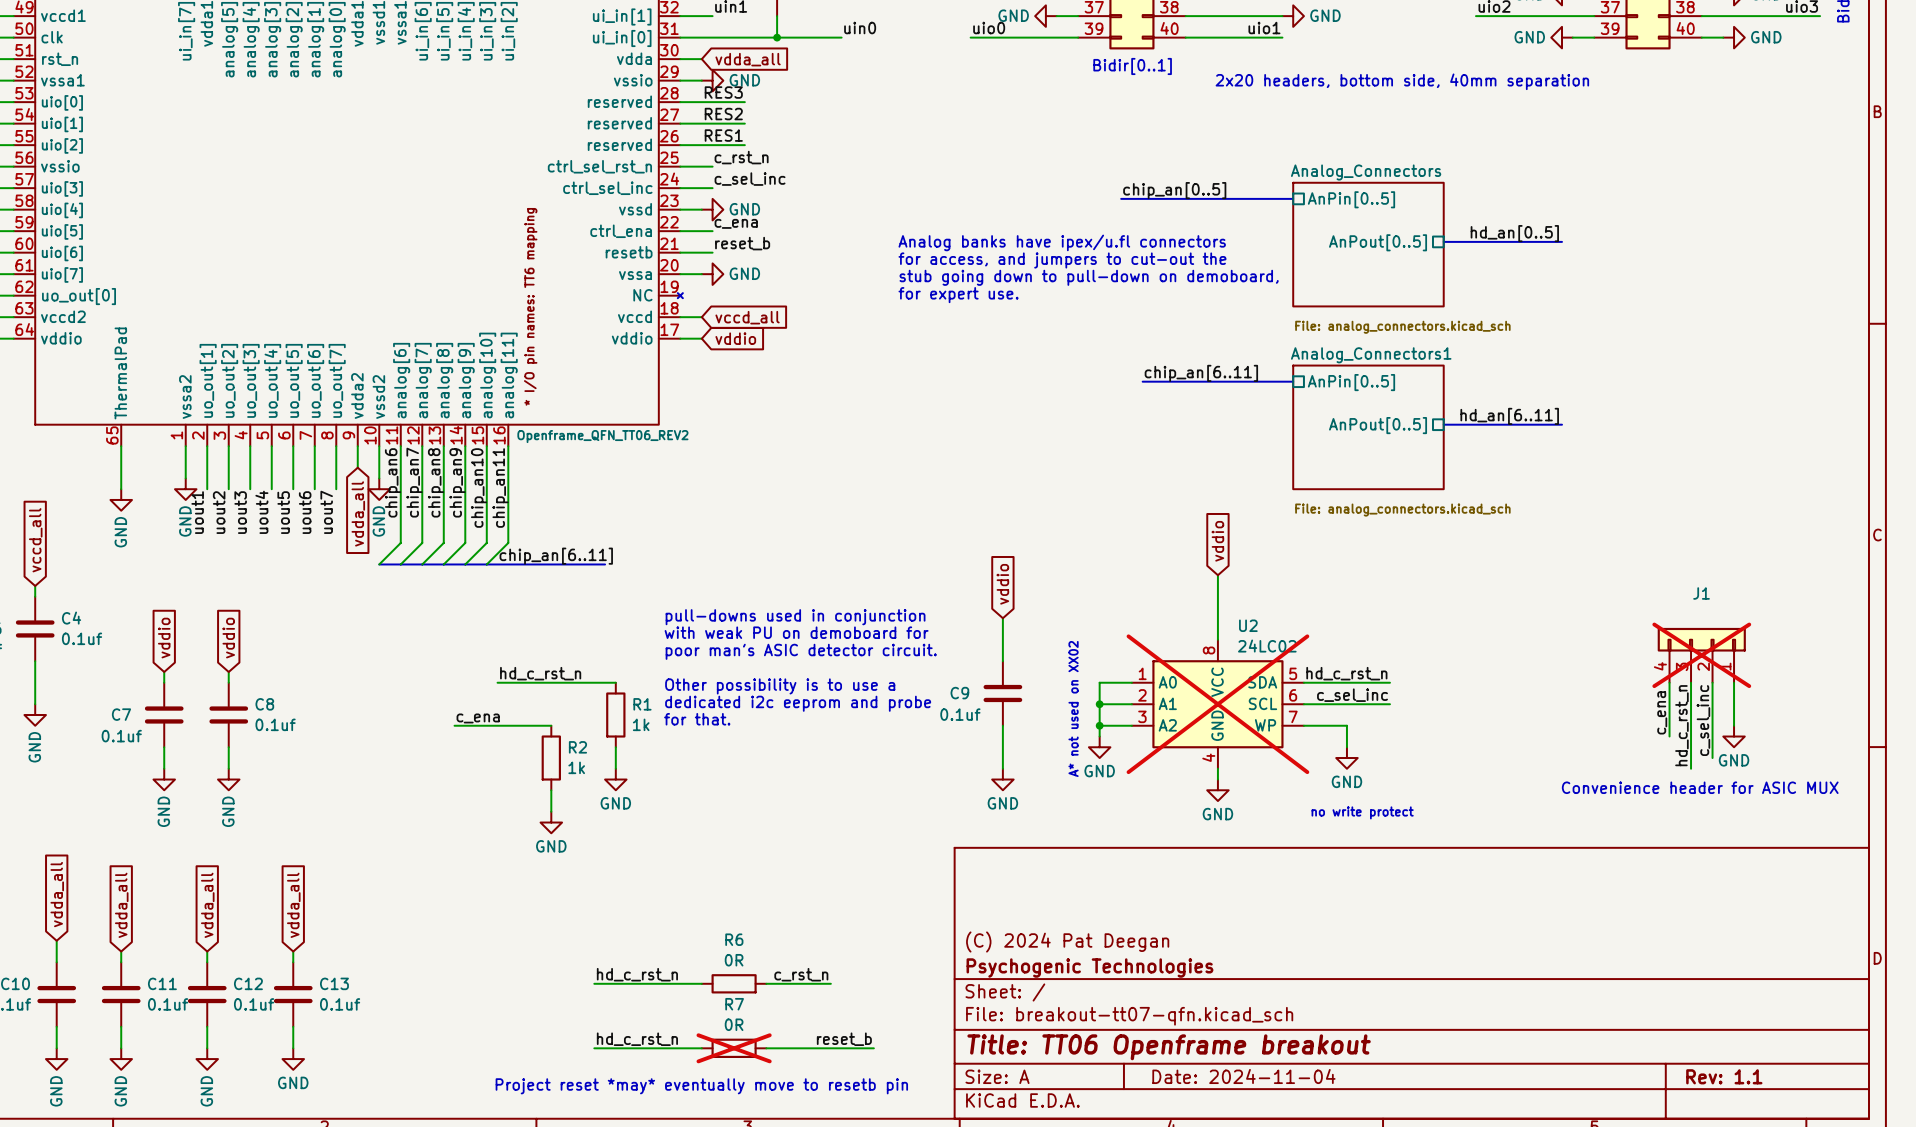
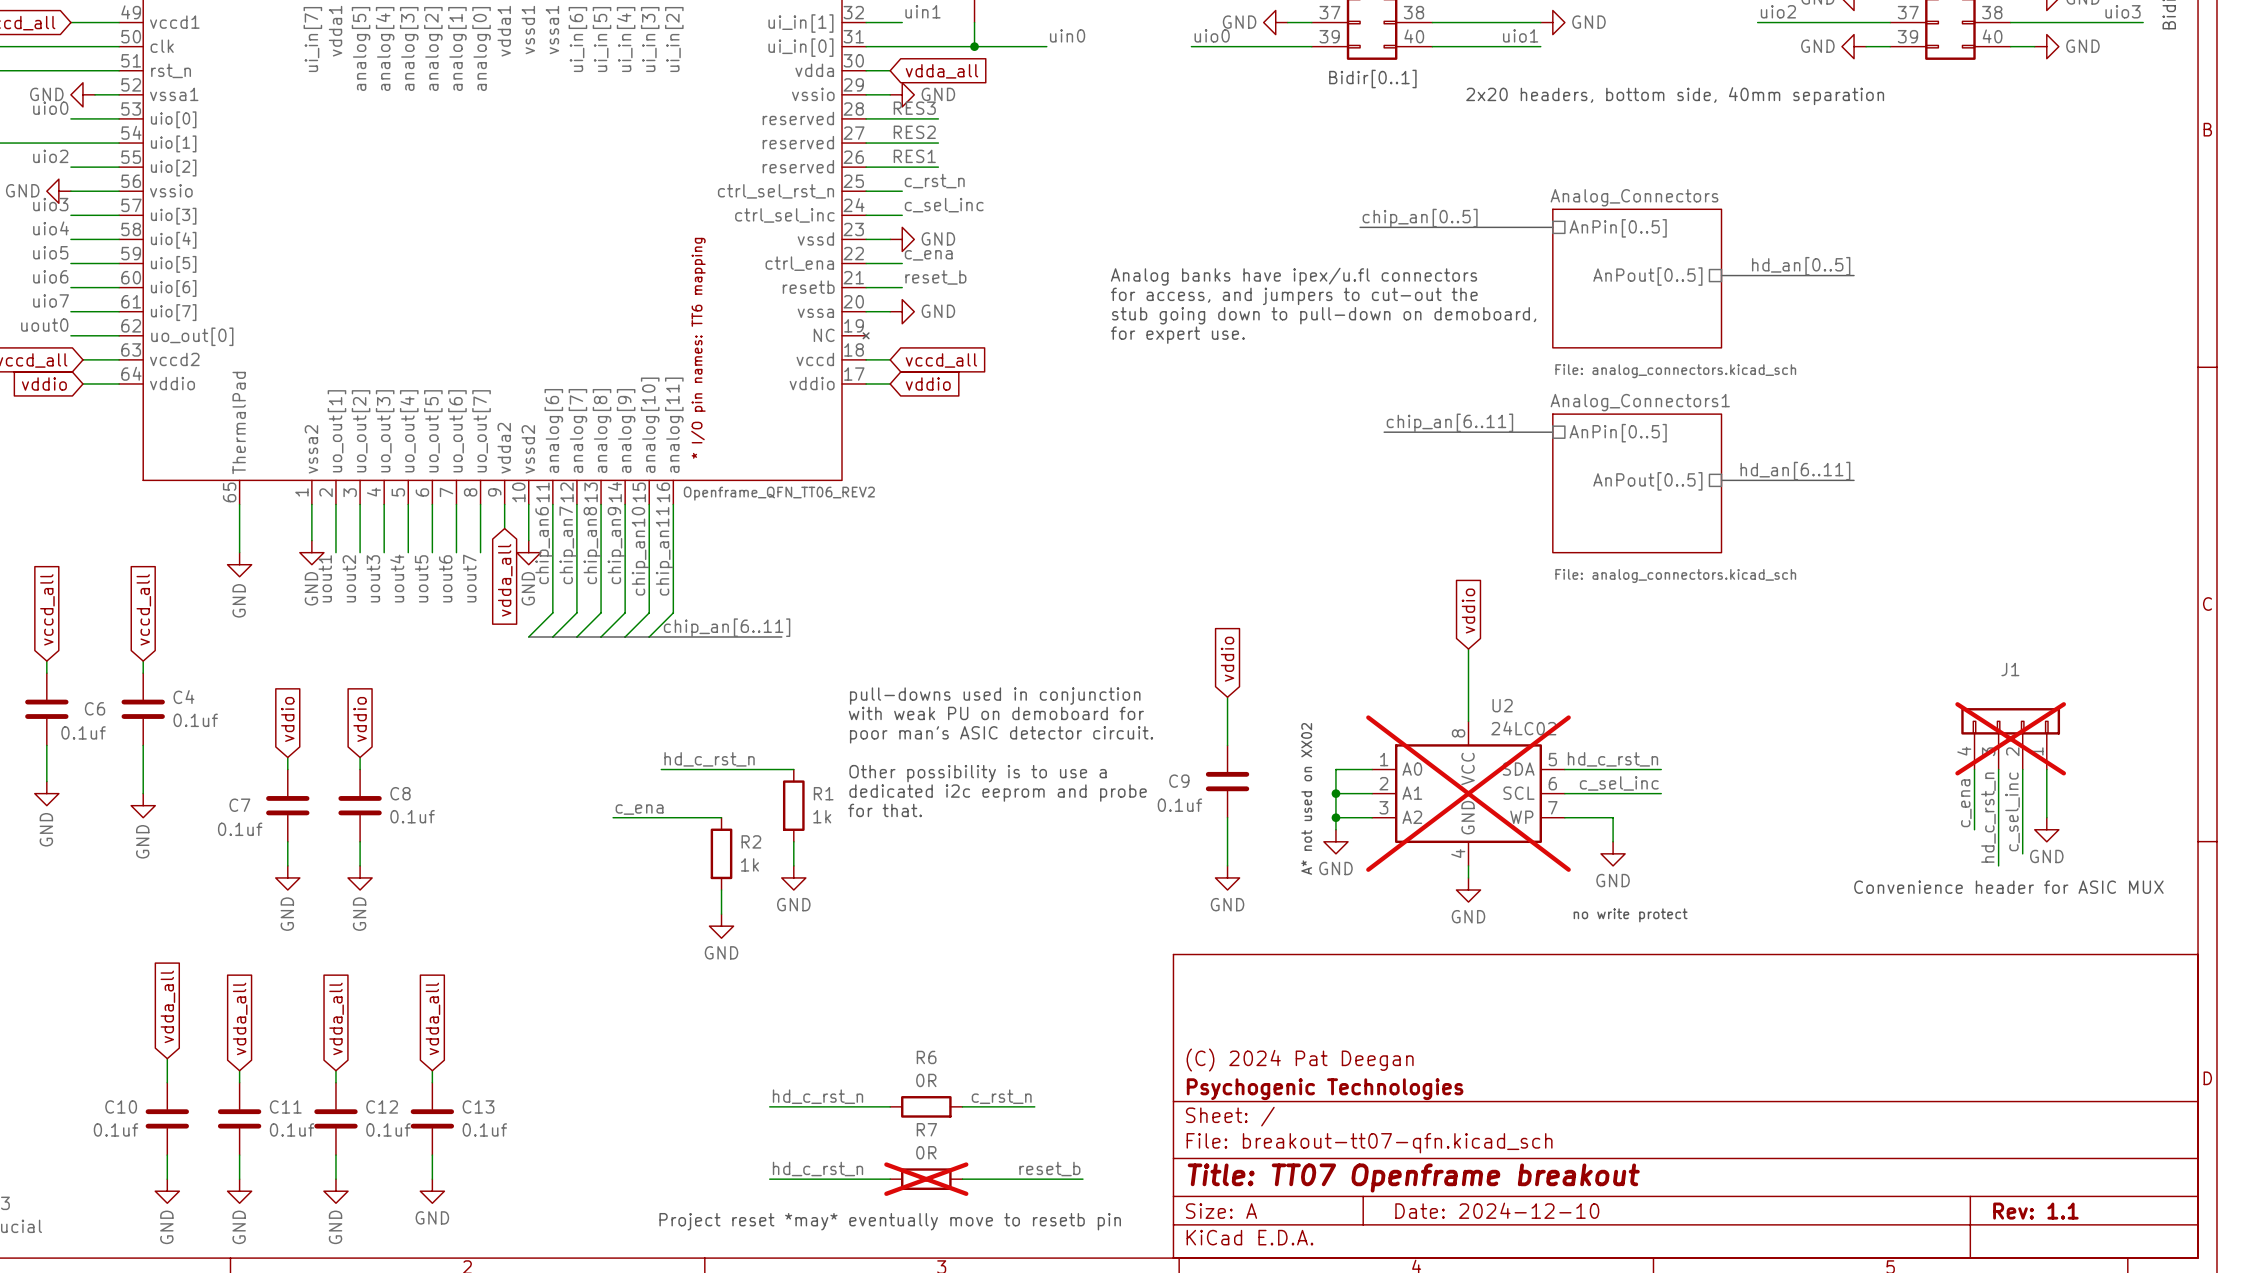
title block: Title: TT06 Openframe breakout (1169, 1047) -> Title: TT07 Openframe breakout (1413, 1178)
title block: Date: 2024-11-04 (1243, 1076) -> Date: 2024-12-10 (1497, 1210)

